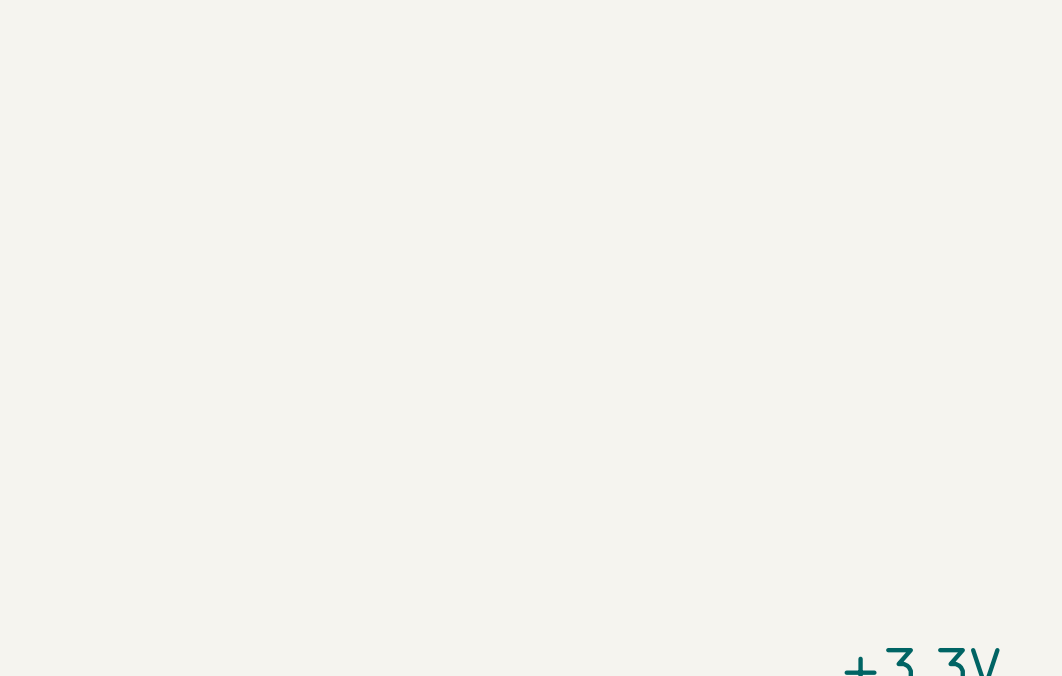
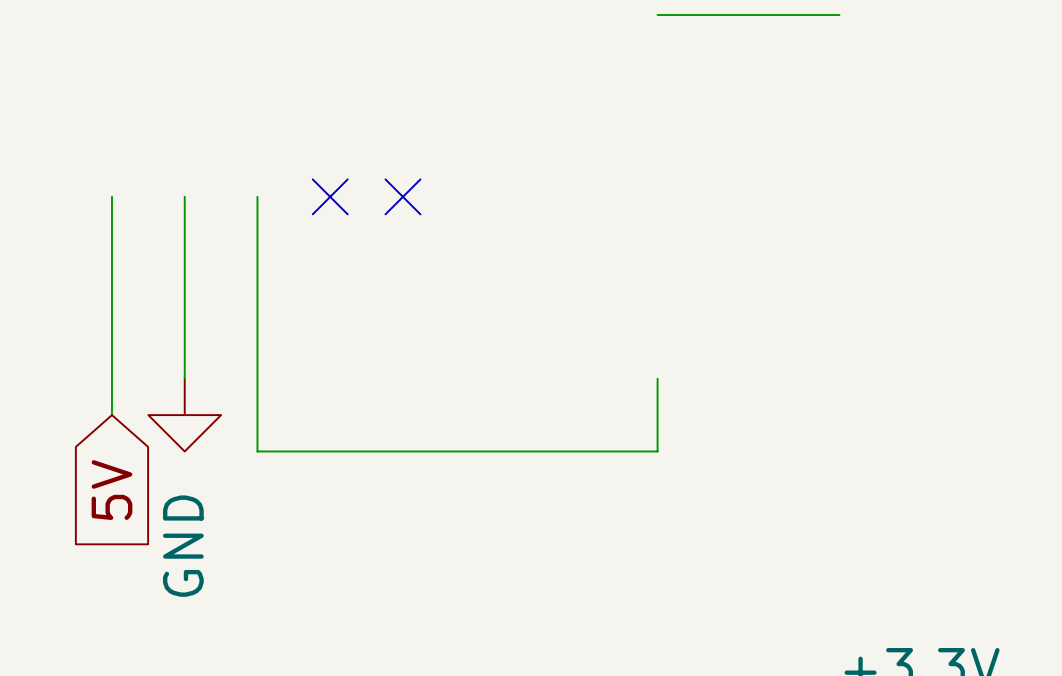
wire: none -> (657, 15) (839, 15)
wire: none -> (111, 196) (111, 415)
wire: none -> (184, 196) (184, 378)
wire: none -> (257, 196) (257, 451) (657, 451) (657, 378)
no-connect mark: none -> (330, 196)
no-connect mark: none -> (402, 196)
power symbol: none -> GND (184, 415)
global label: none -> 5V (111, 490)

